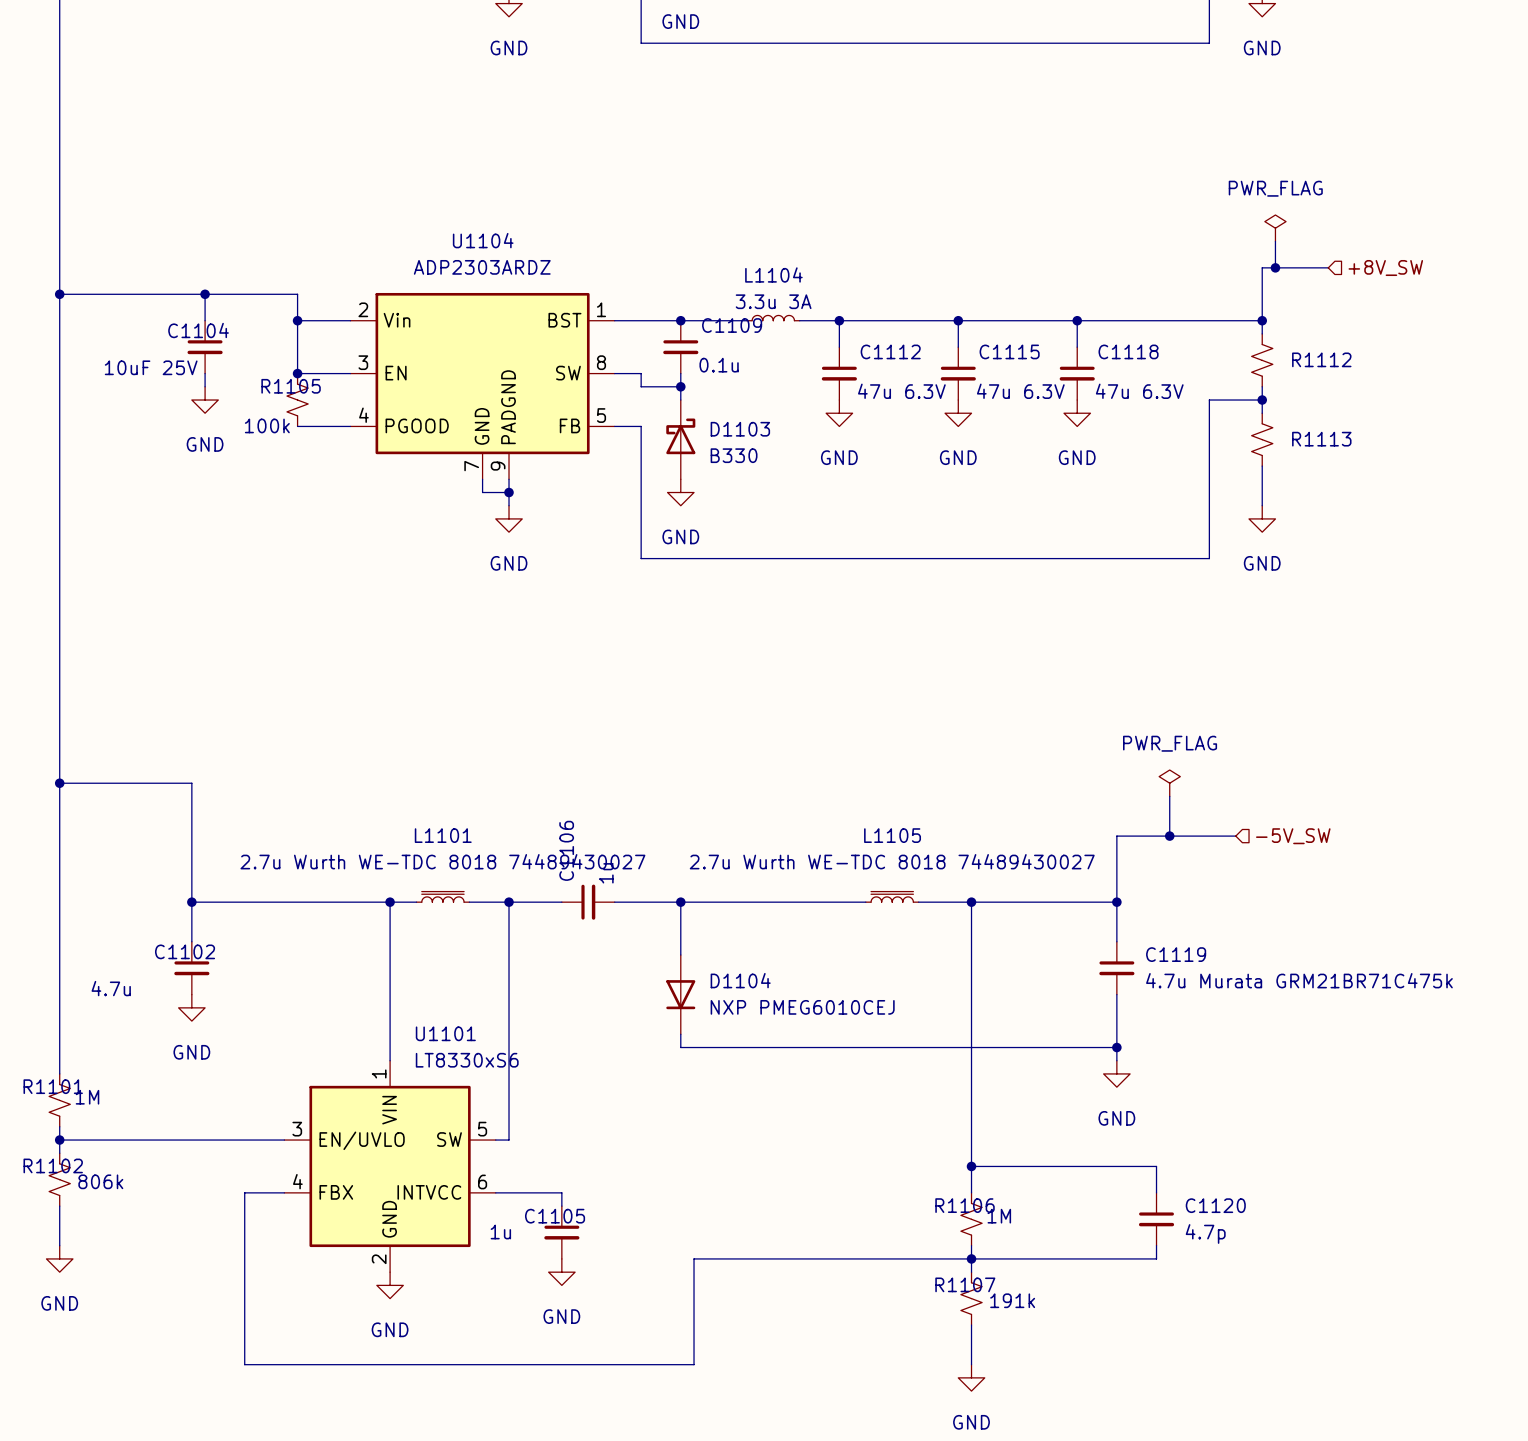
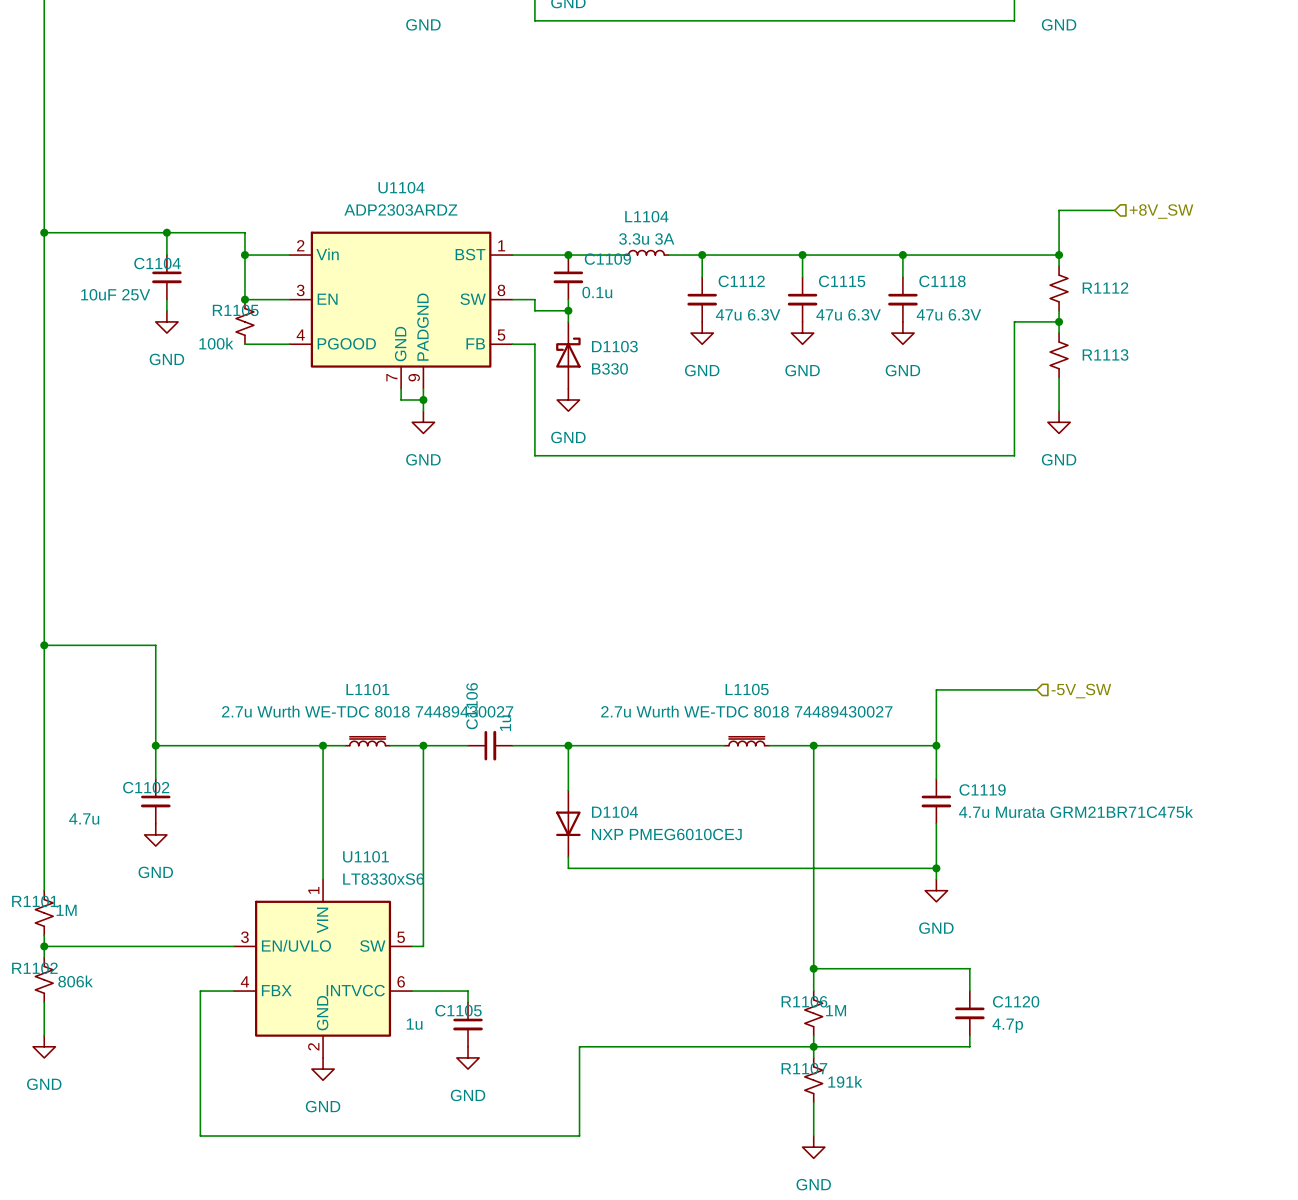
power symbol: PWR_FLAG (1275, 228) -> none
wire: (1275, 241) (1275, 267) -> none
junction: (1275, 267) -> none
power symbol: PWR_FLAG (1169, 783) -> none
wire: (1169, 796) (1169, 836) -> none
junction: (1169, 836) -> none

